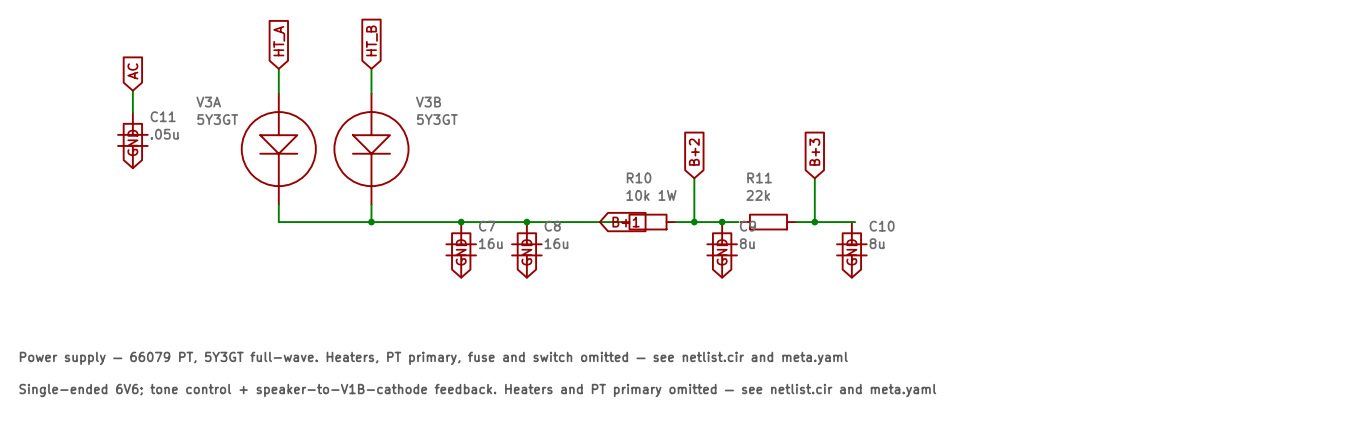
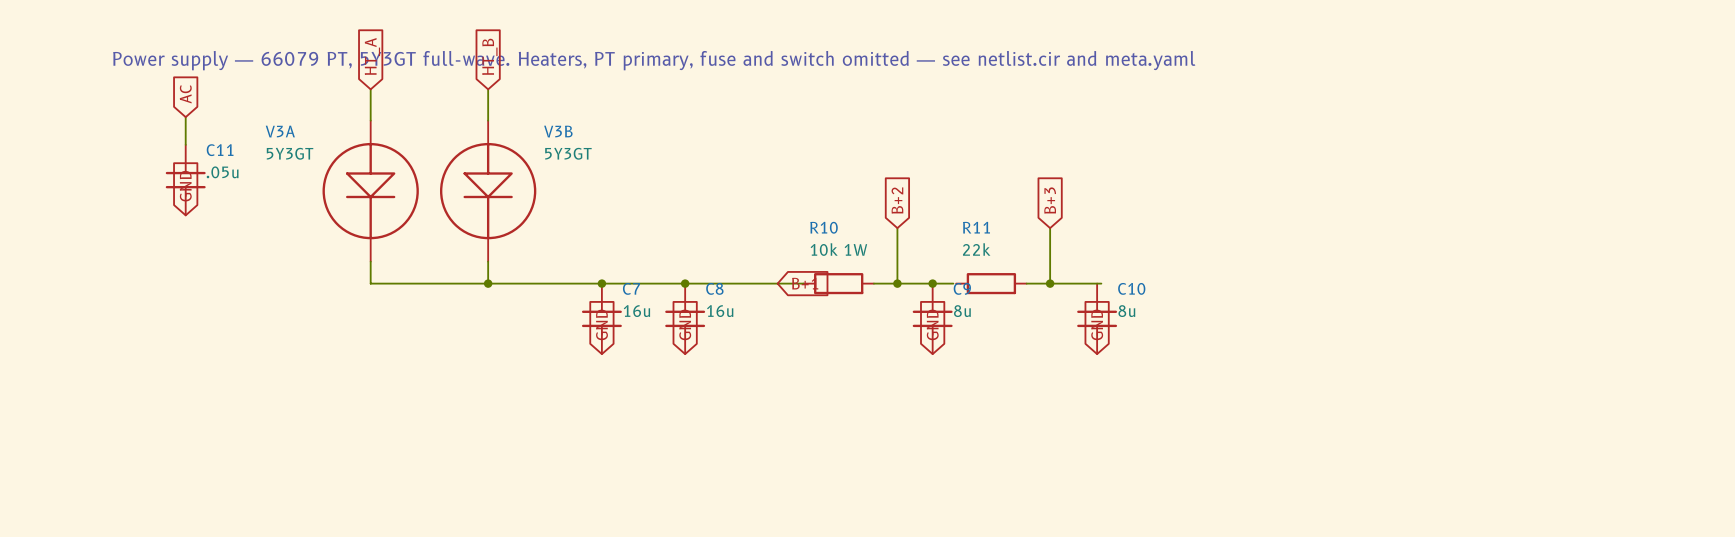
text: none -> Power supply — 66079 PT, 5Y3GT full-wave. Heaters, PT primary, fuse and switch omitted — see netlist.cir and meta.yaml (654, 60)
text: Power supply — 66079 PT, 5Y3GT full-wave. Heaters, PT primary, fuse and switch omitted — see netlist.cir and meta.yaml (433, 358) -> none
text: Single-ended 6V6; tone control + speaker-to-V1B-cathode feedback. Heaters and PT primary omitted — see netlist.cir and meta.yaml (477, 390) -> none

